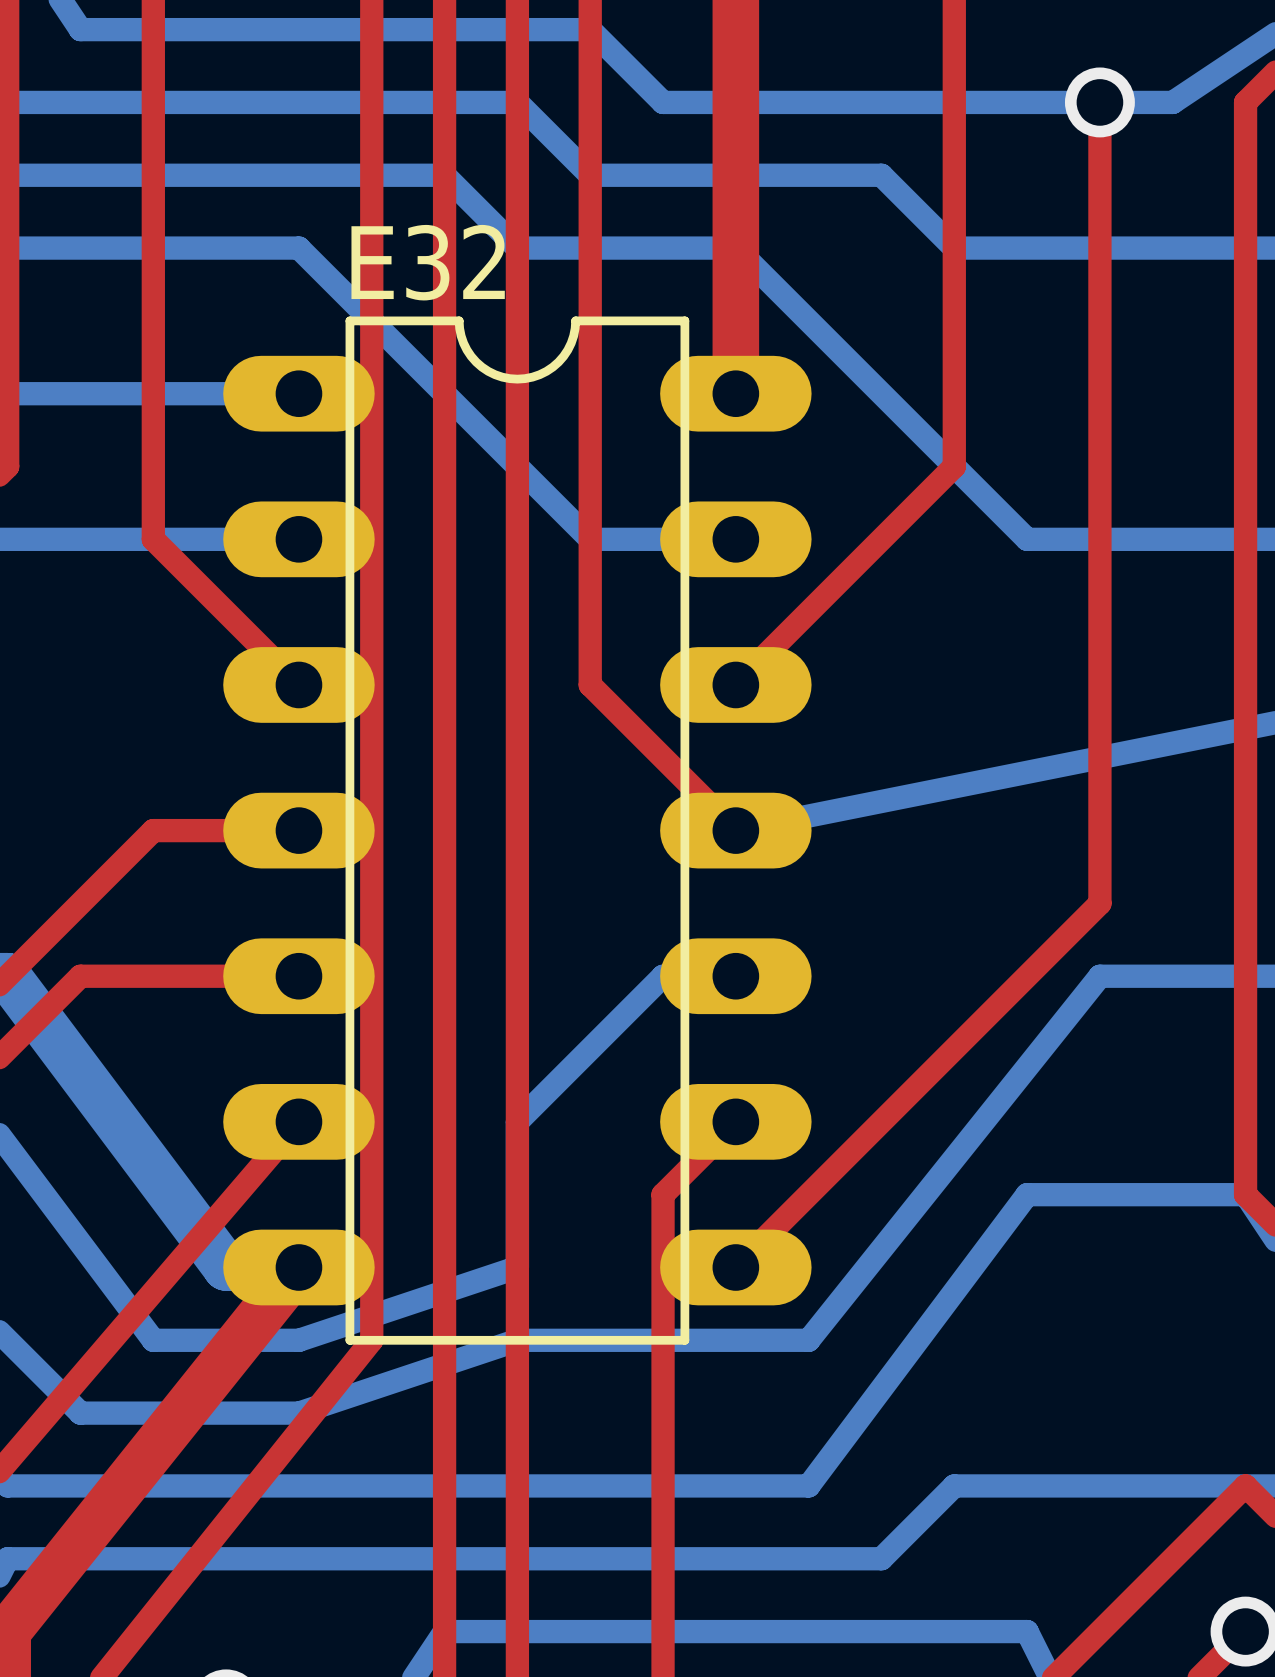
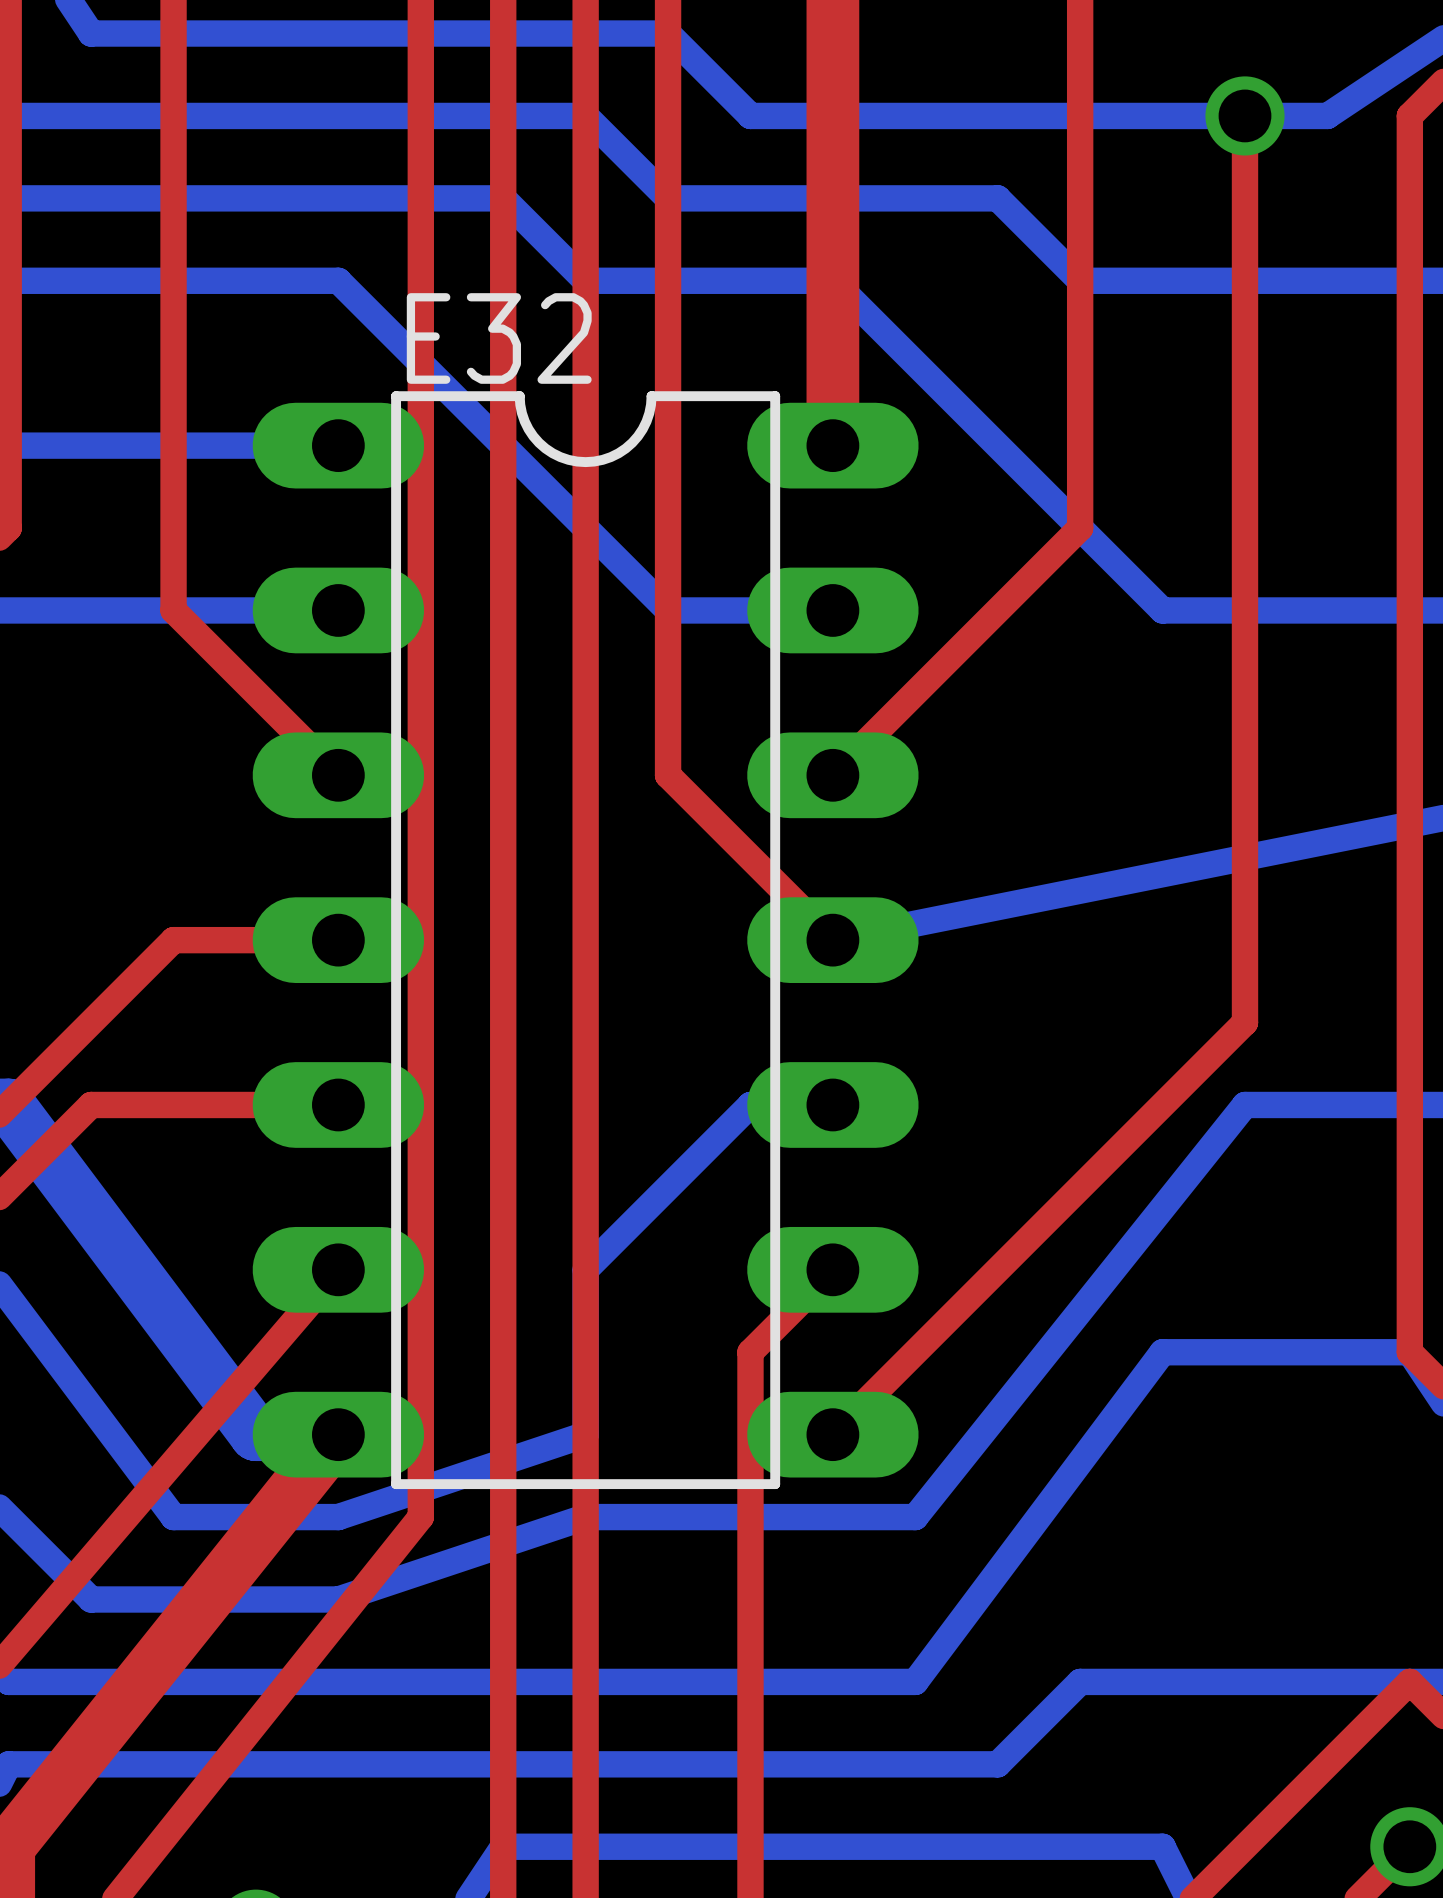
E32 name position: E32 (428, 262) -> E32 (499, 338)
E32 footprint: [223, 316, 812, 1345] -> [252, 391, 919, 1490]

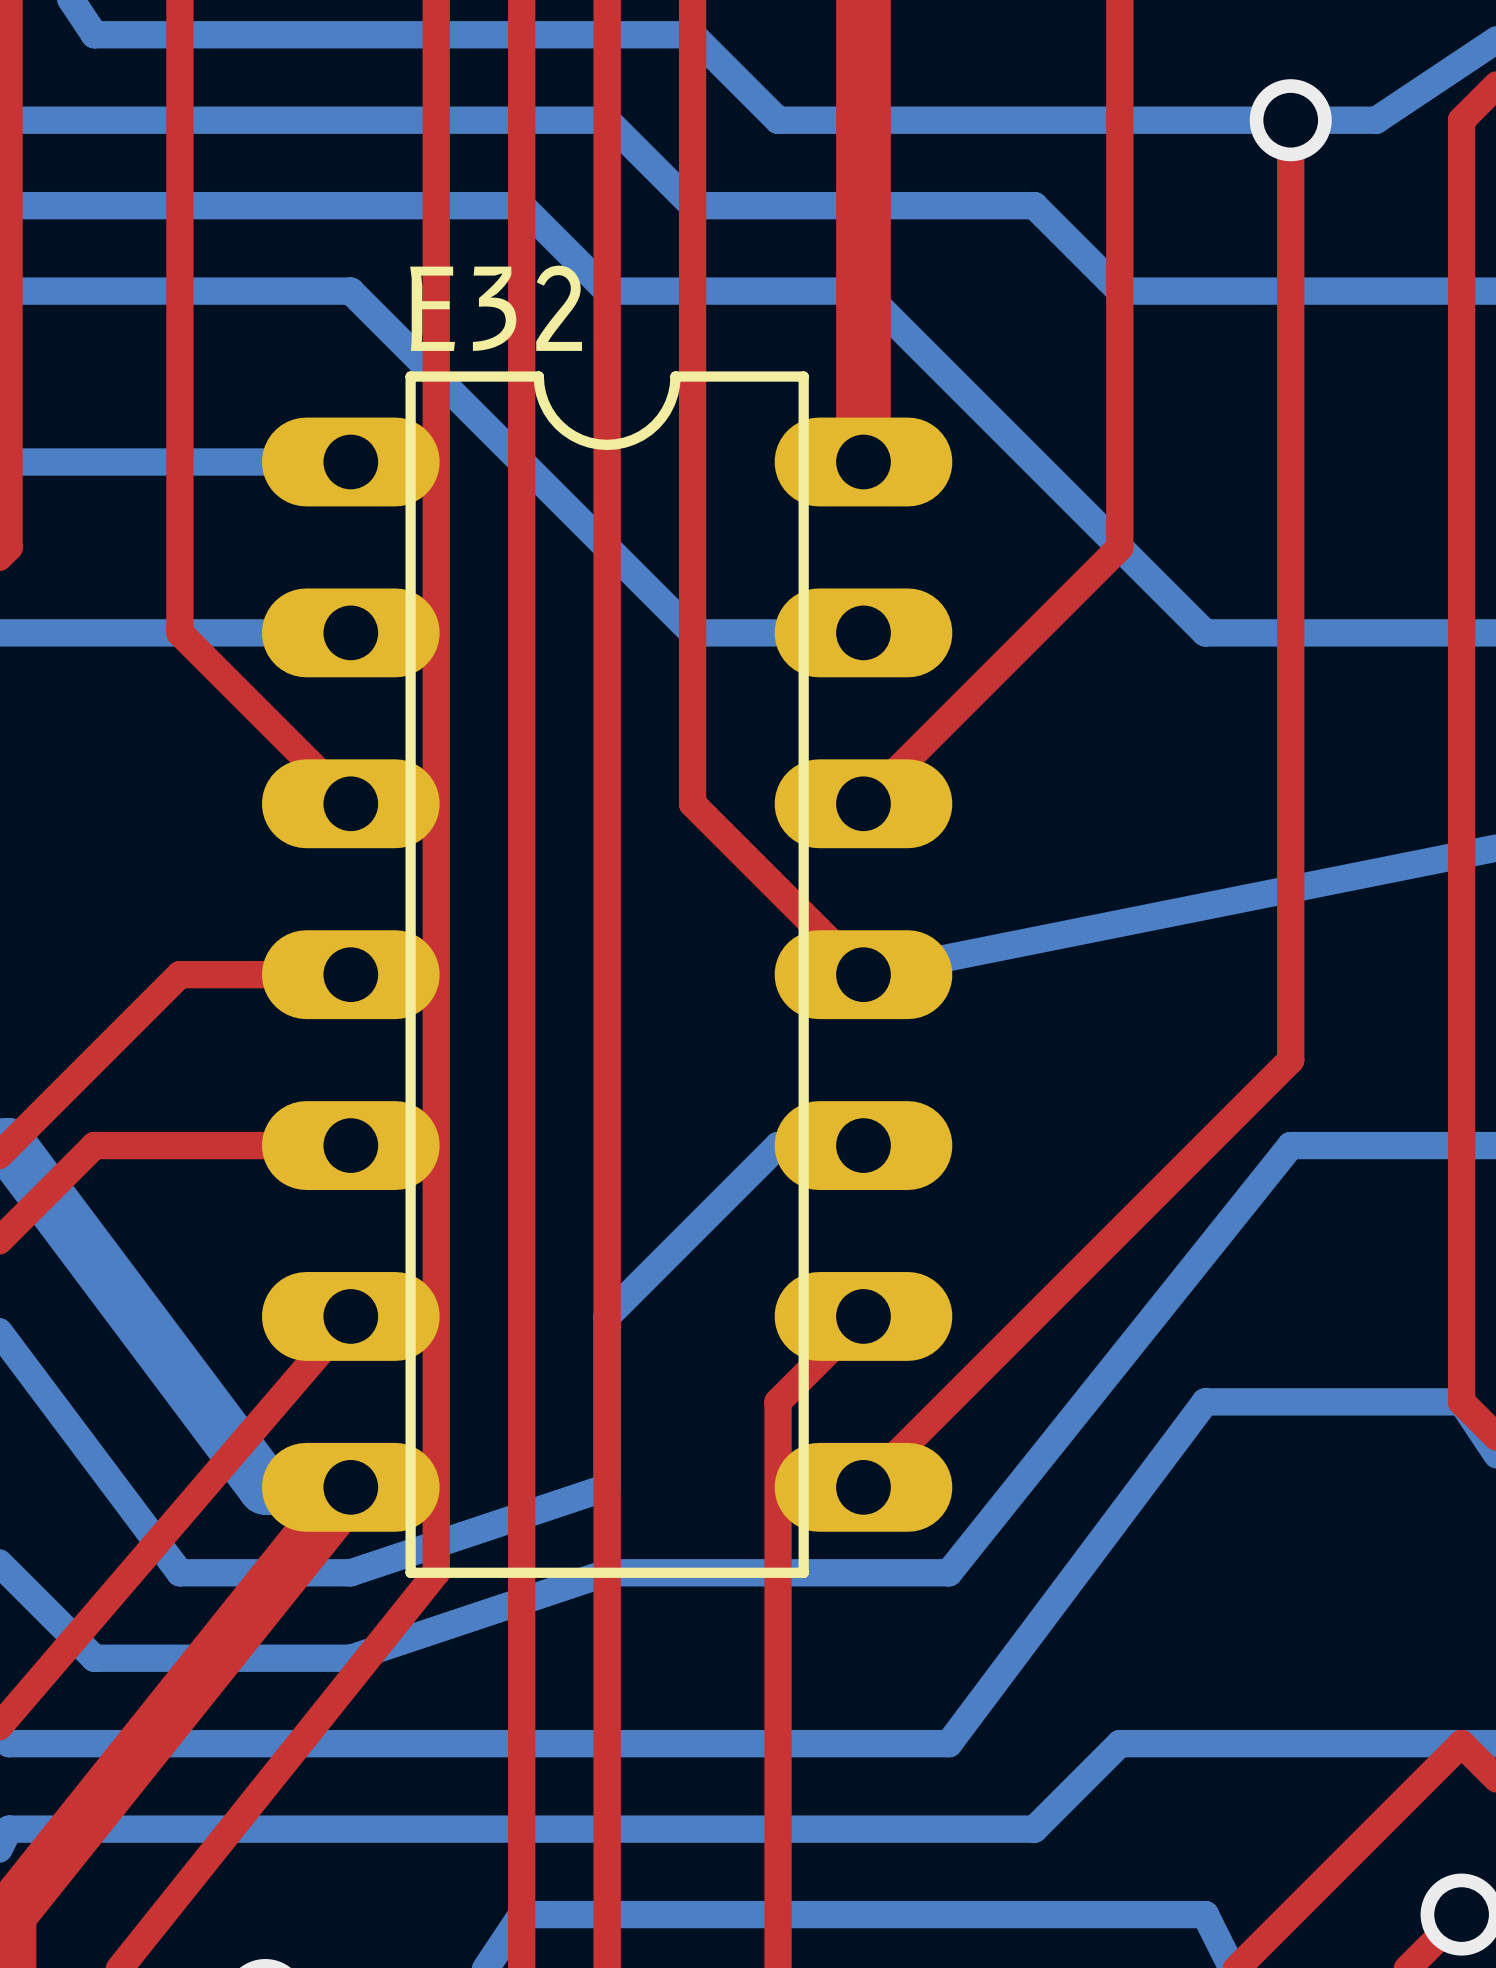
E32 name position: E32 (499, 338) -> E32 (496, 308)
E32 footprint: [252, 391, 919, 1490] -> [261, 371, 953, 1578]

